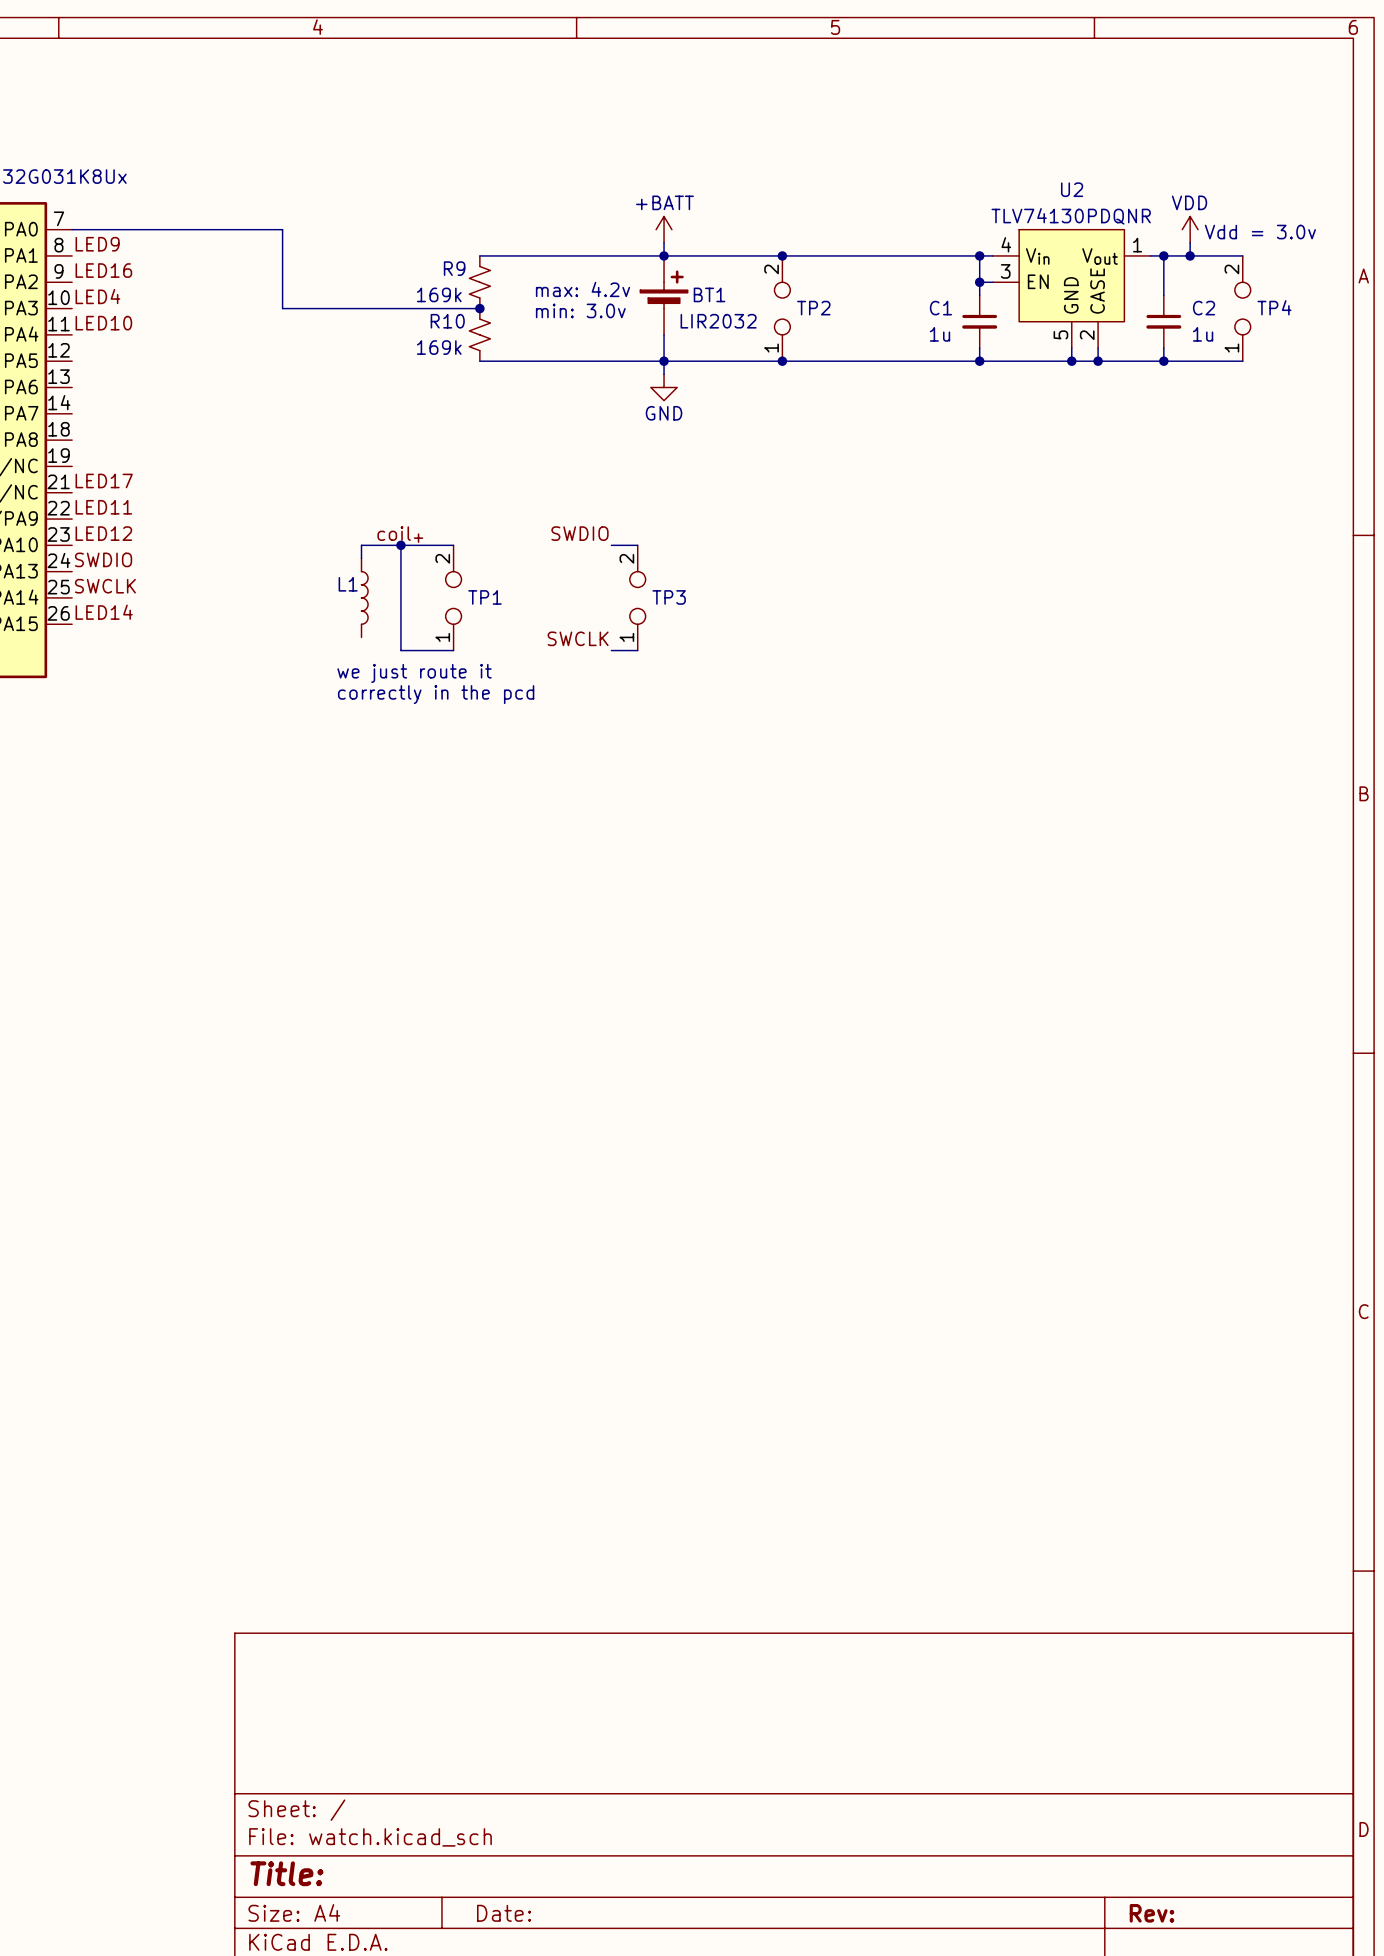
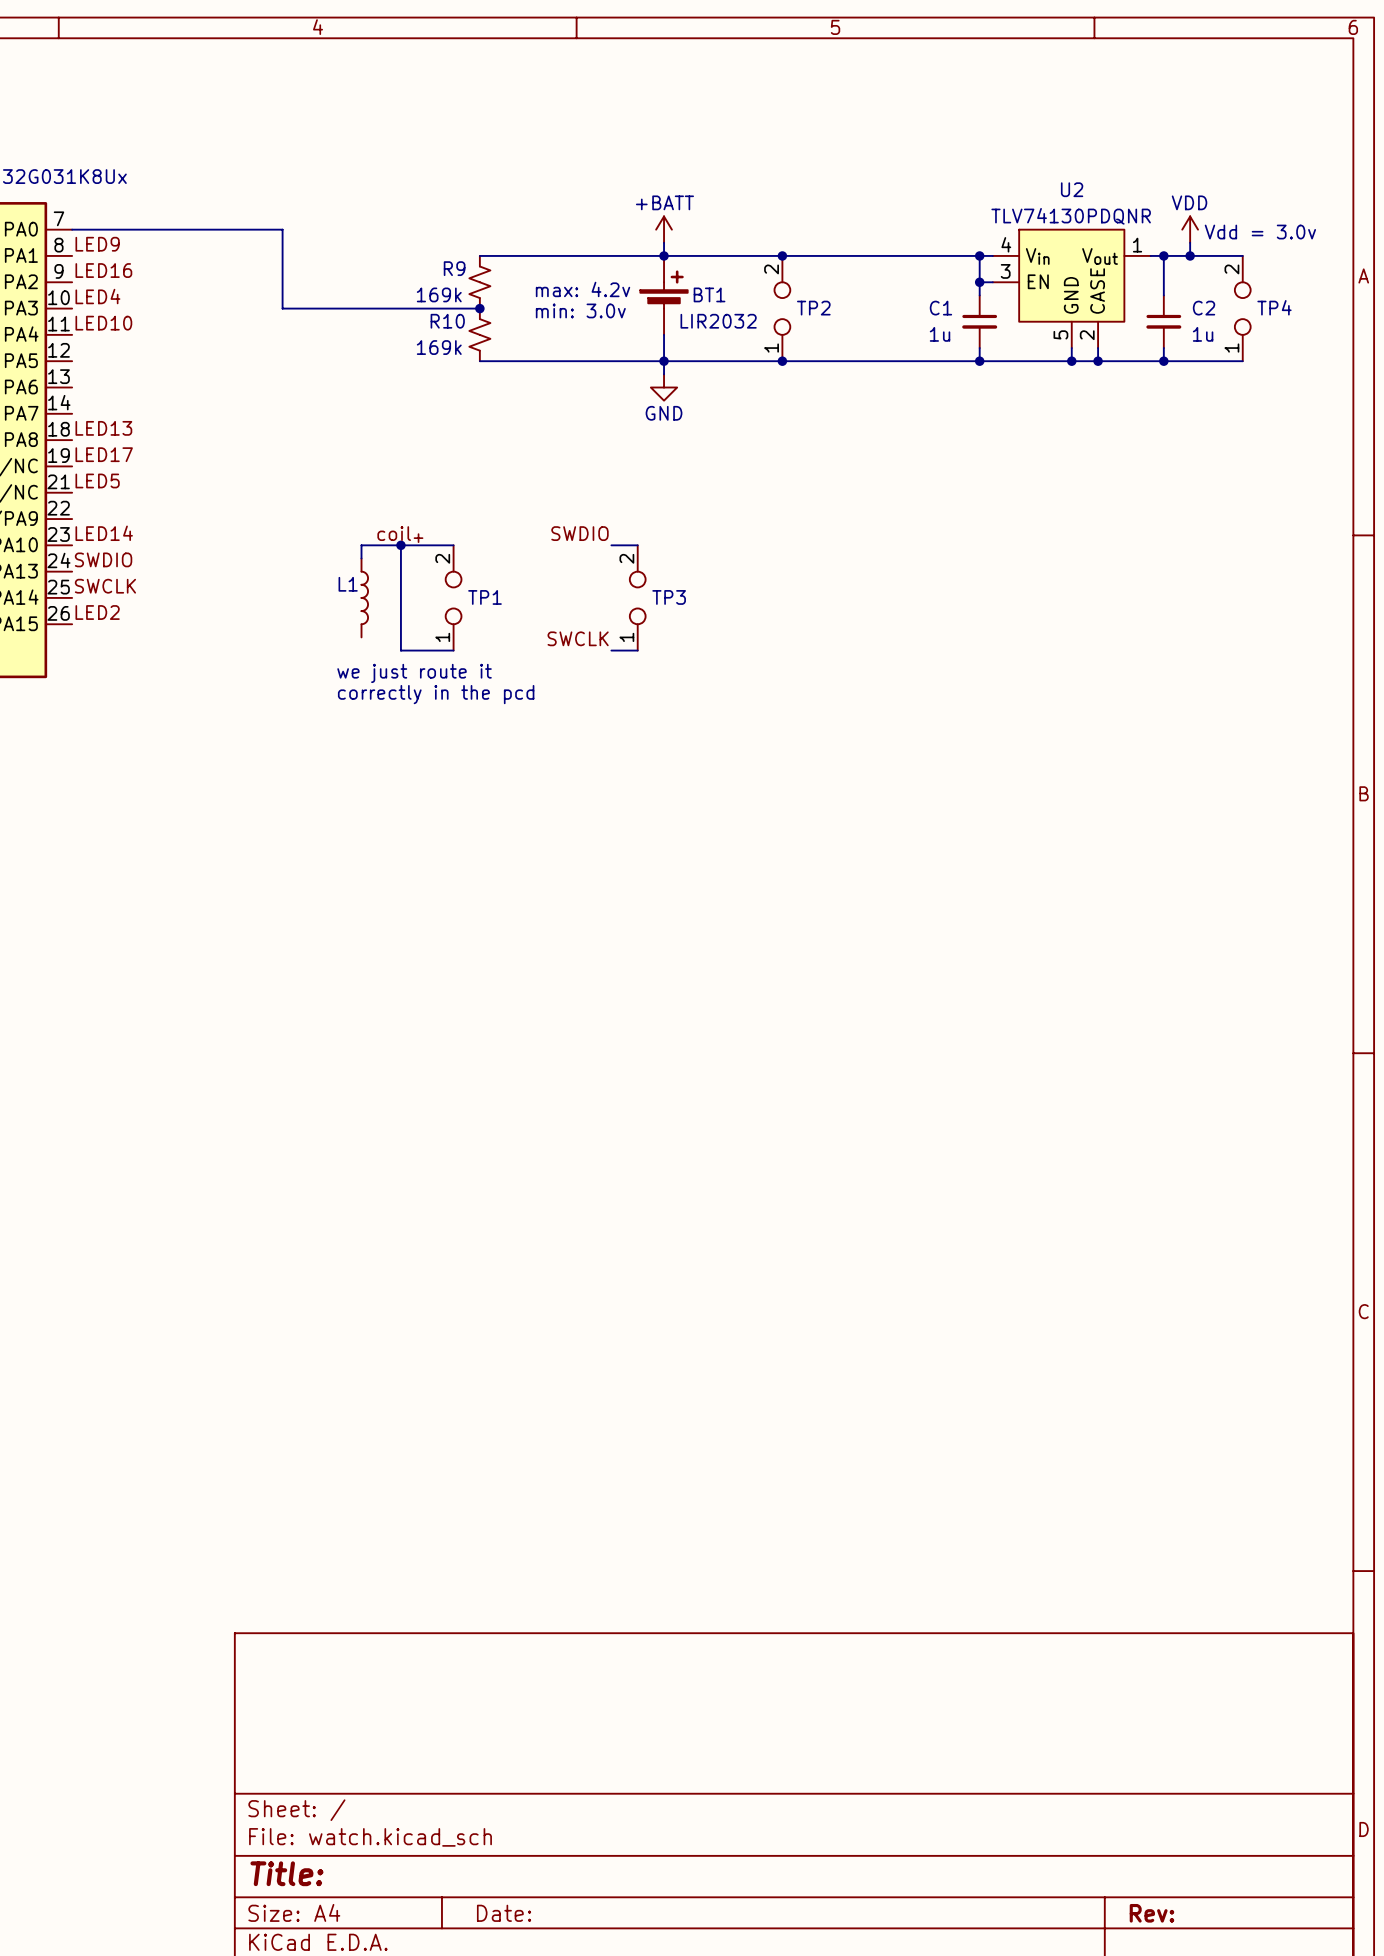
label: none -> LED13 (103, 428)
label: none -> LED17 (104, 454)
label: LED17 (104, 480) -> LED5 (97, 480)
label: LED11 (103, 507) -> none
label: LED12 (103, 533) -> LED14 (104, 533)
label: LED14 (104, 612) -> LED2 (97, 612)

